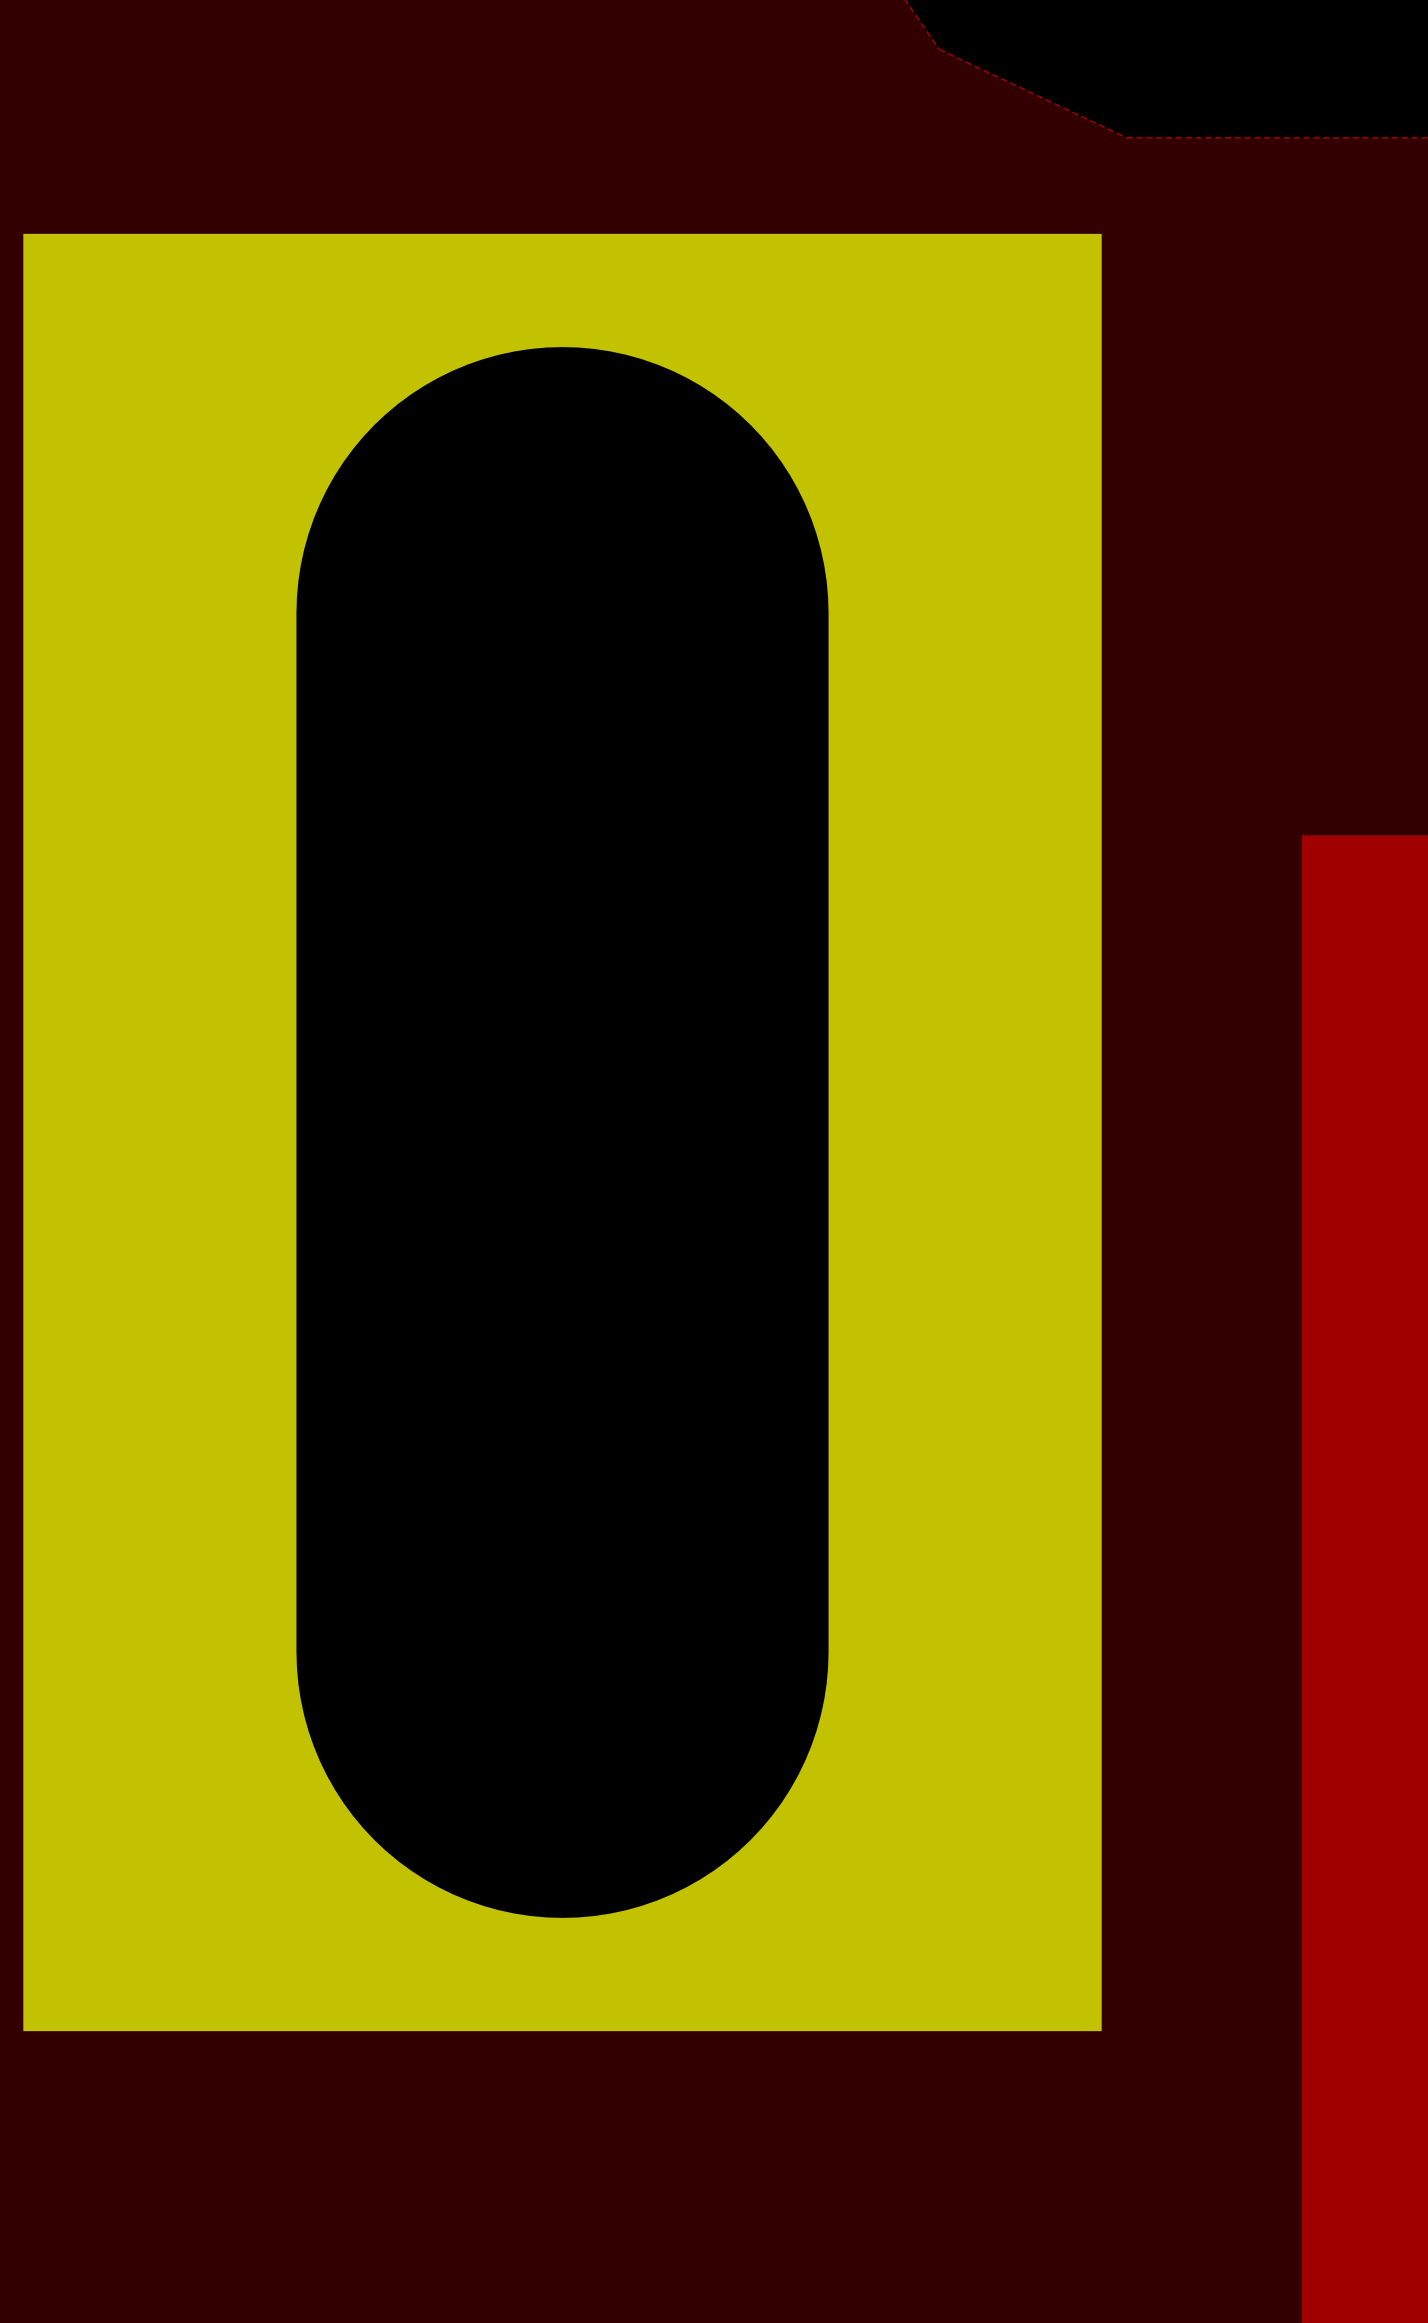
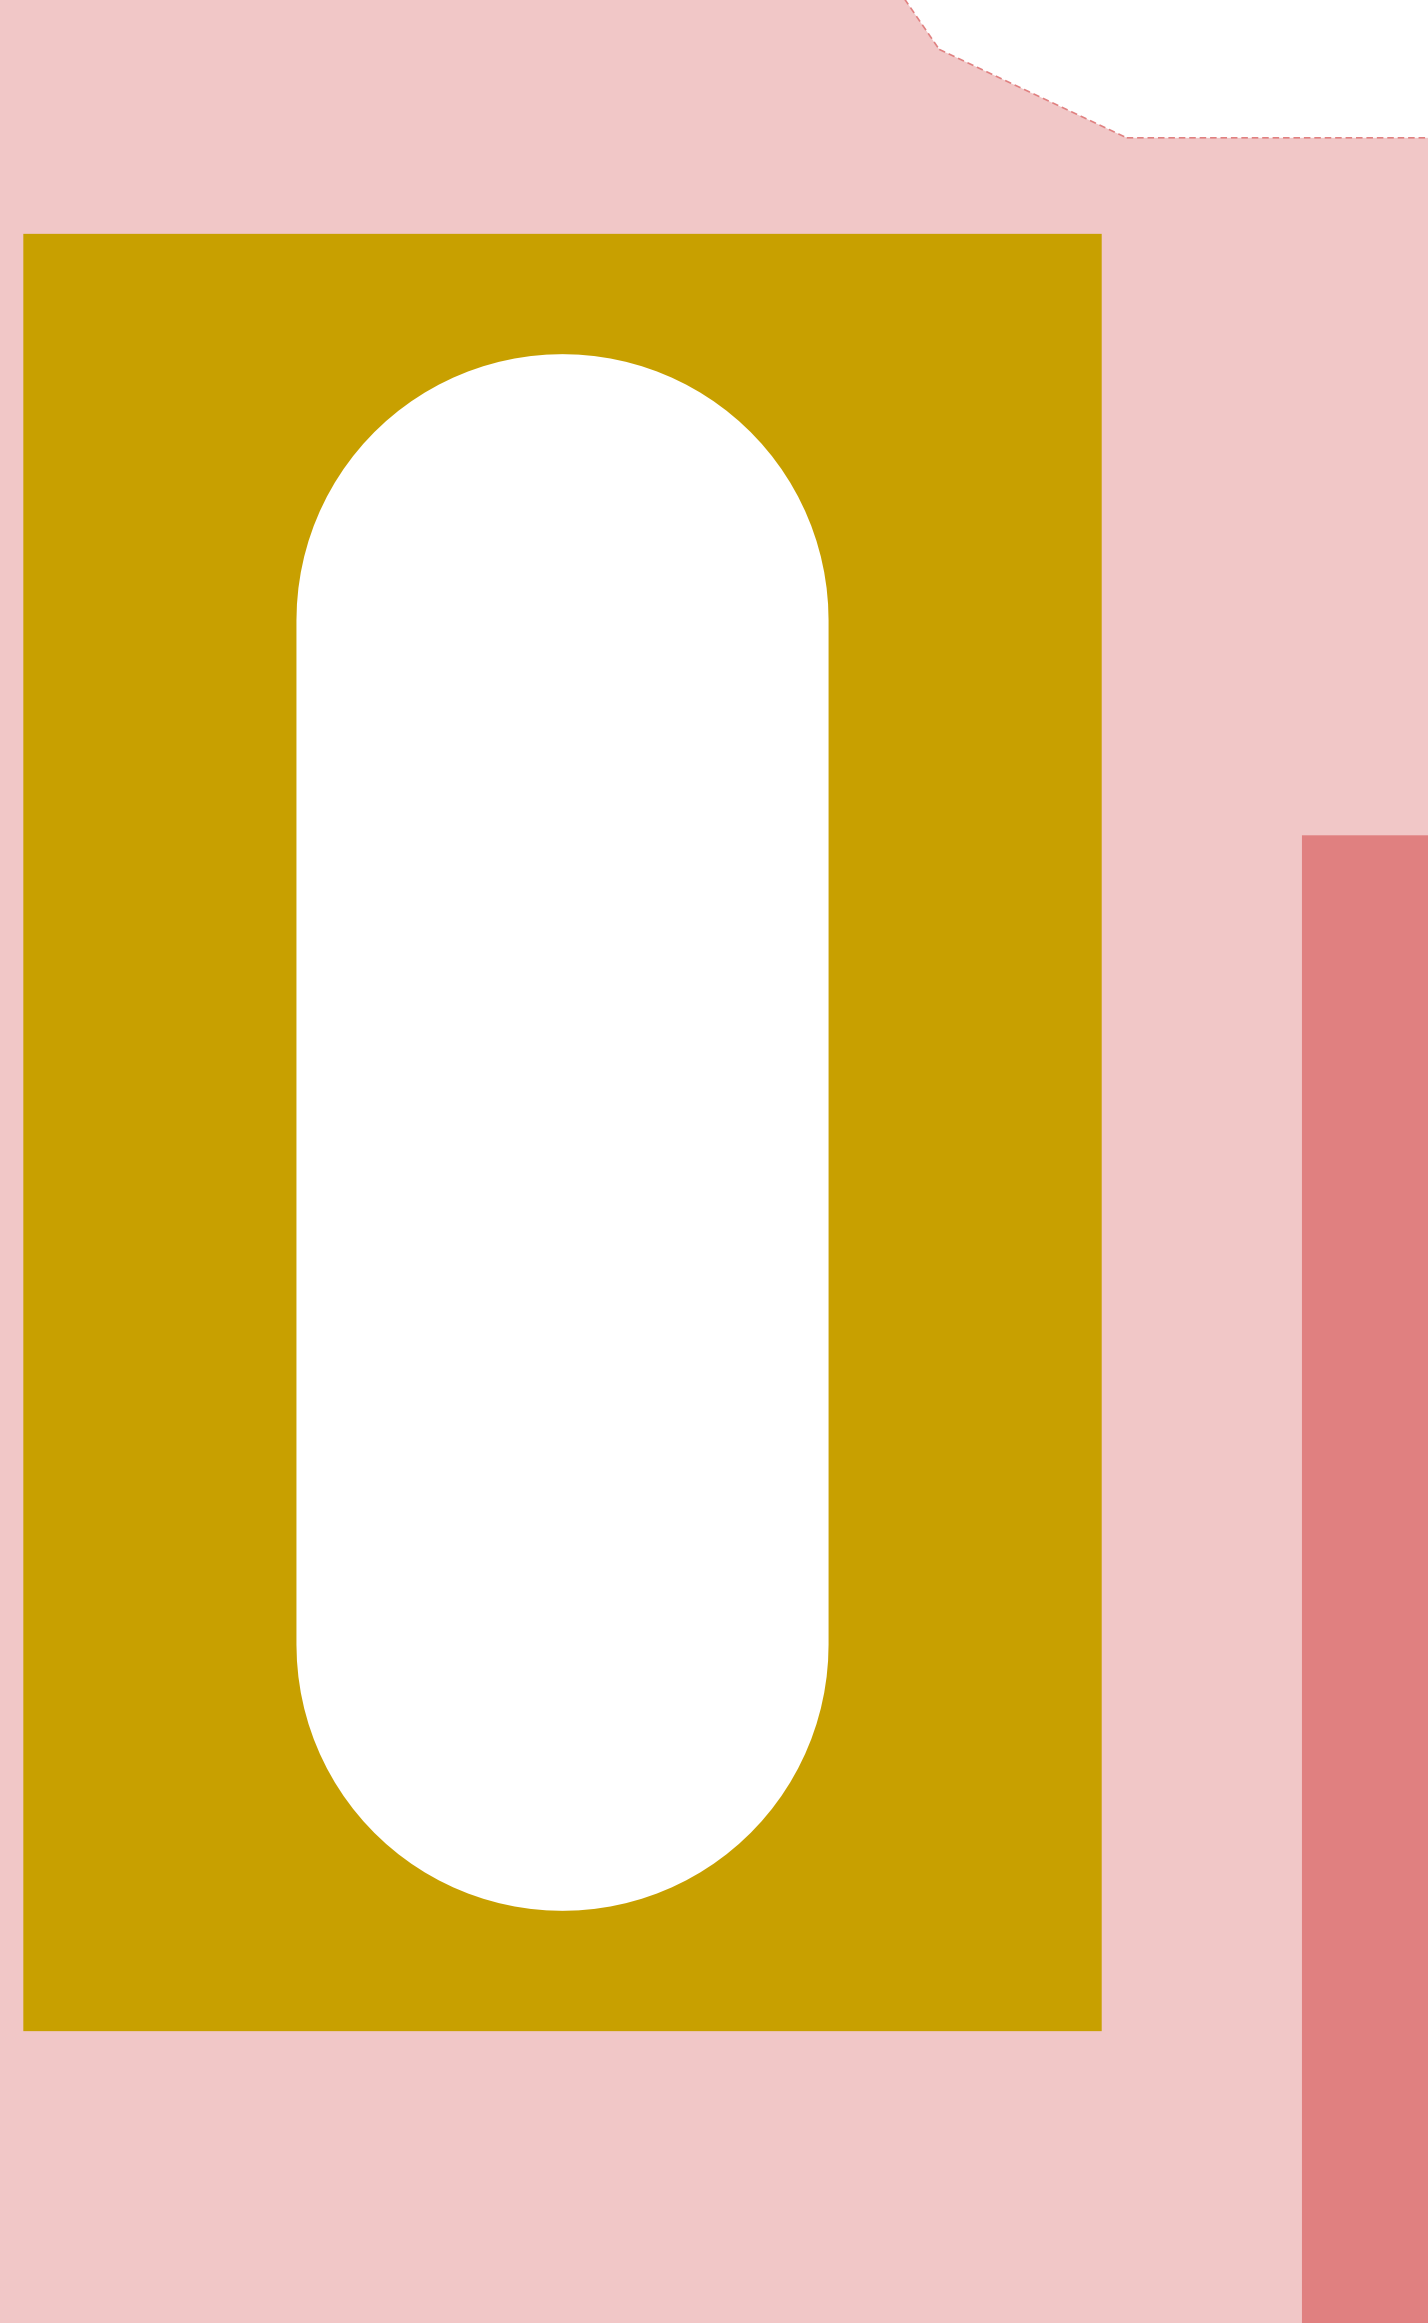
part footprint: [23, 233, 1102, 2032] -> [23, 233, 1102, 2032]

